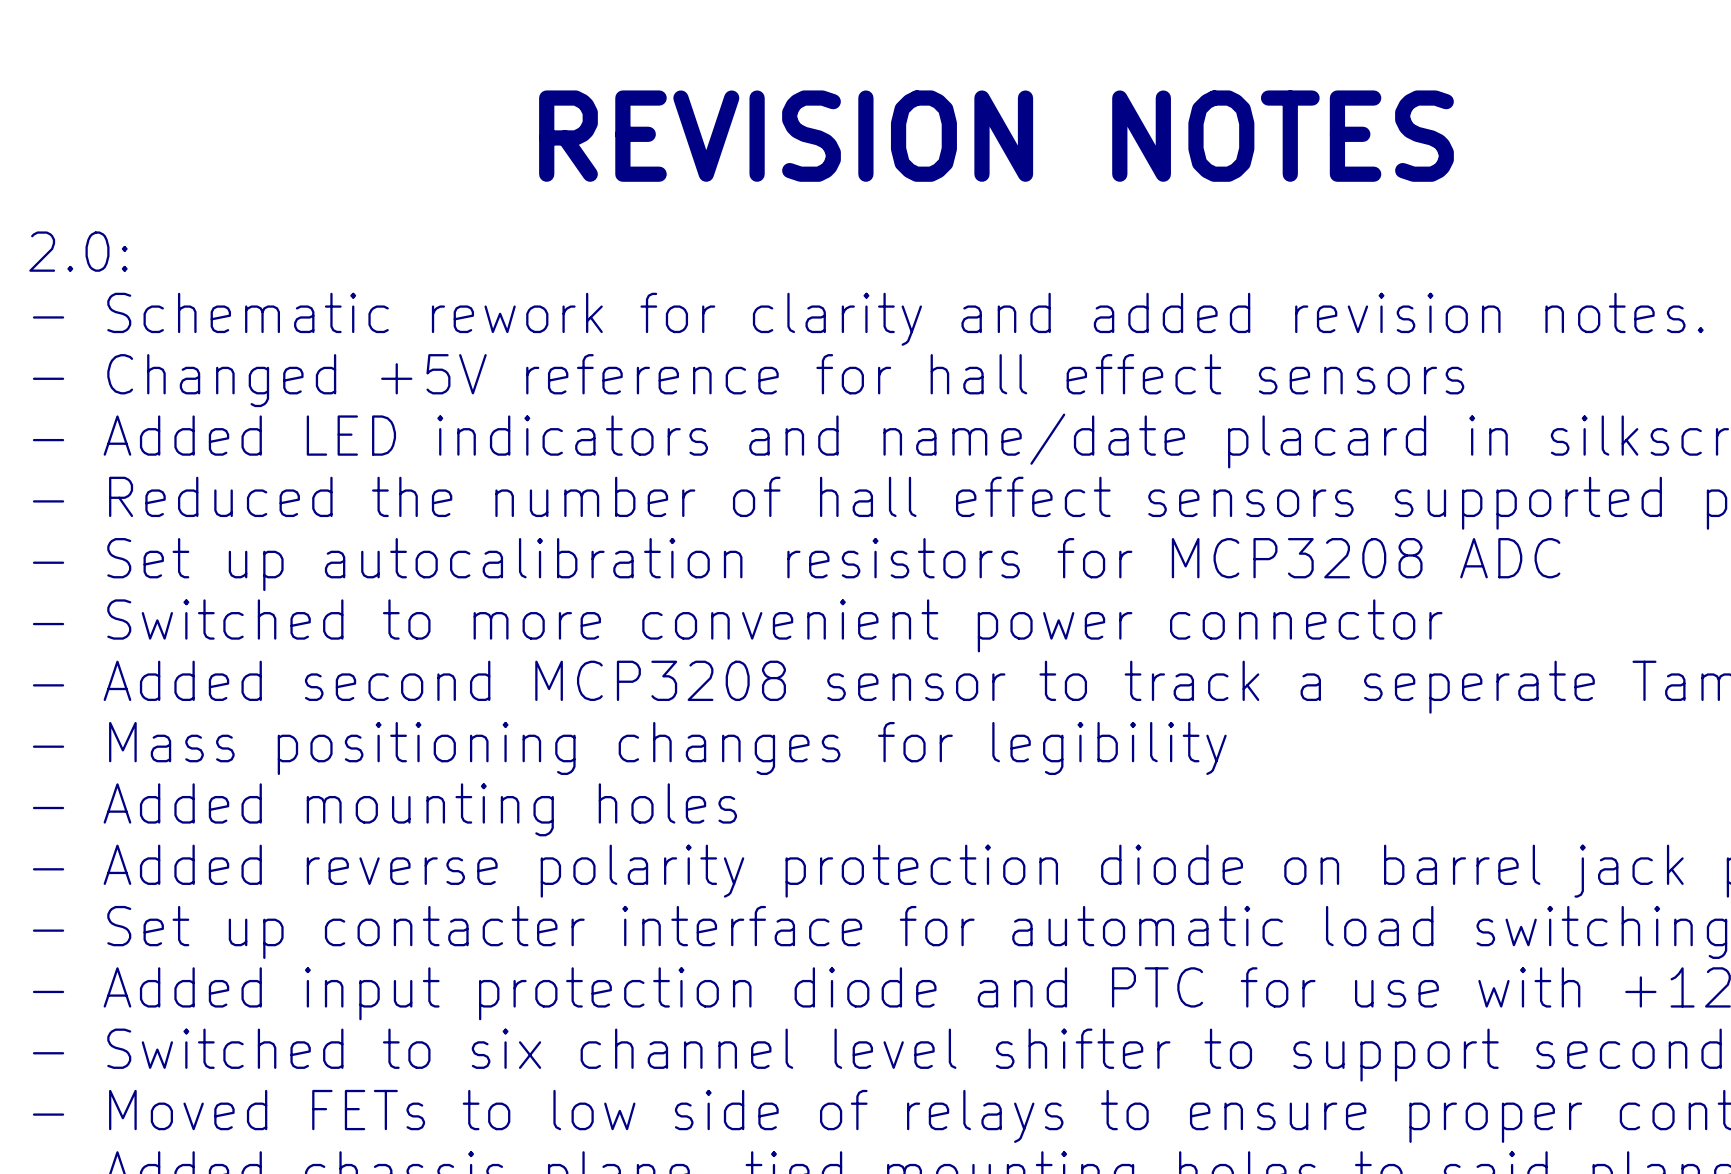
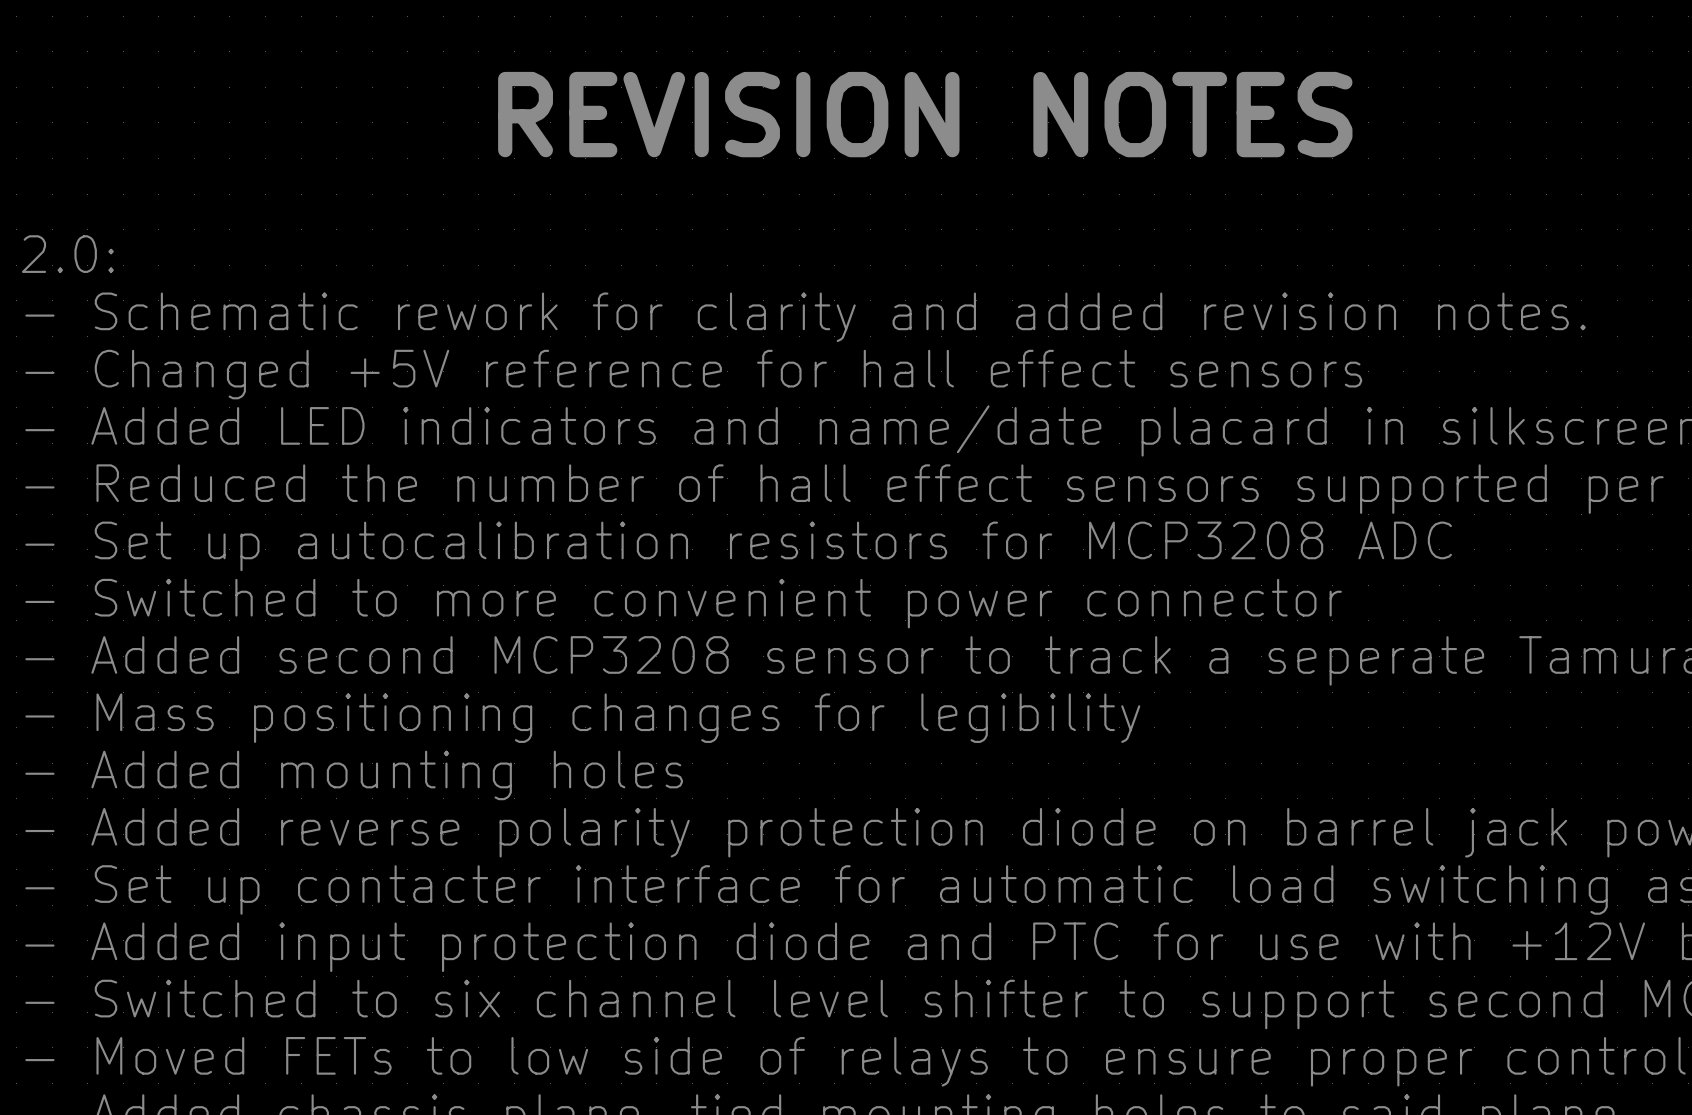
text position: REVISION NOTES (996, 136) -> REVISION NOTES (925, 114)

